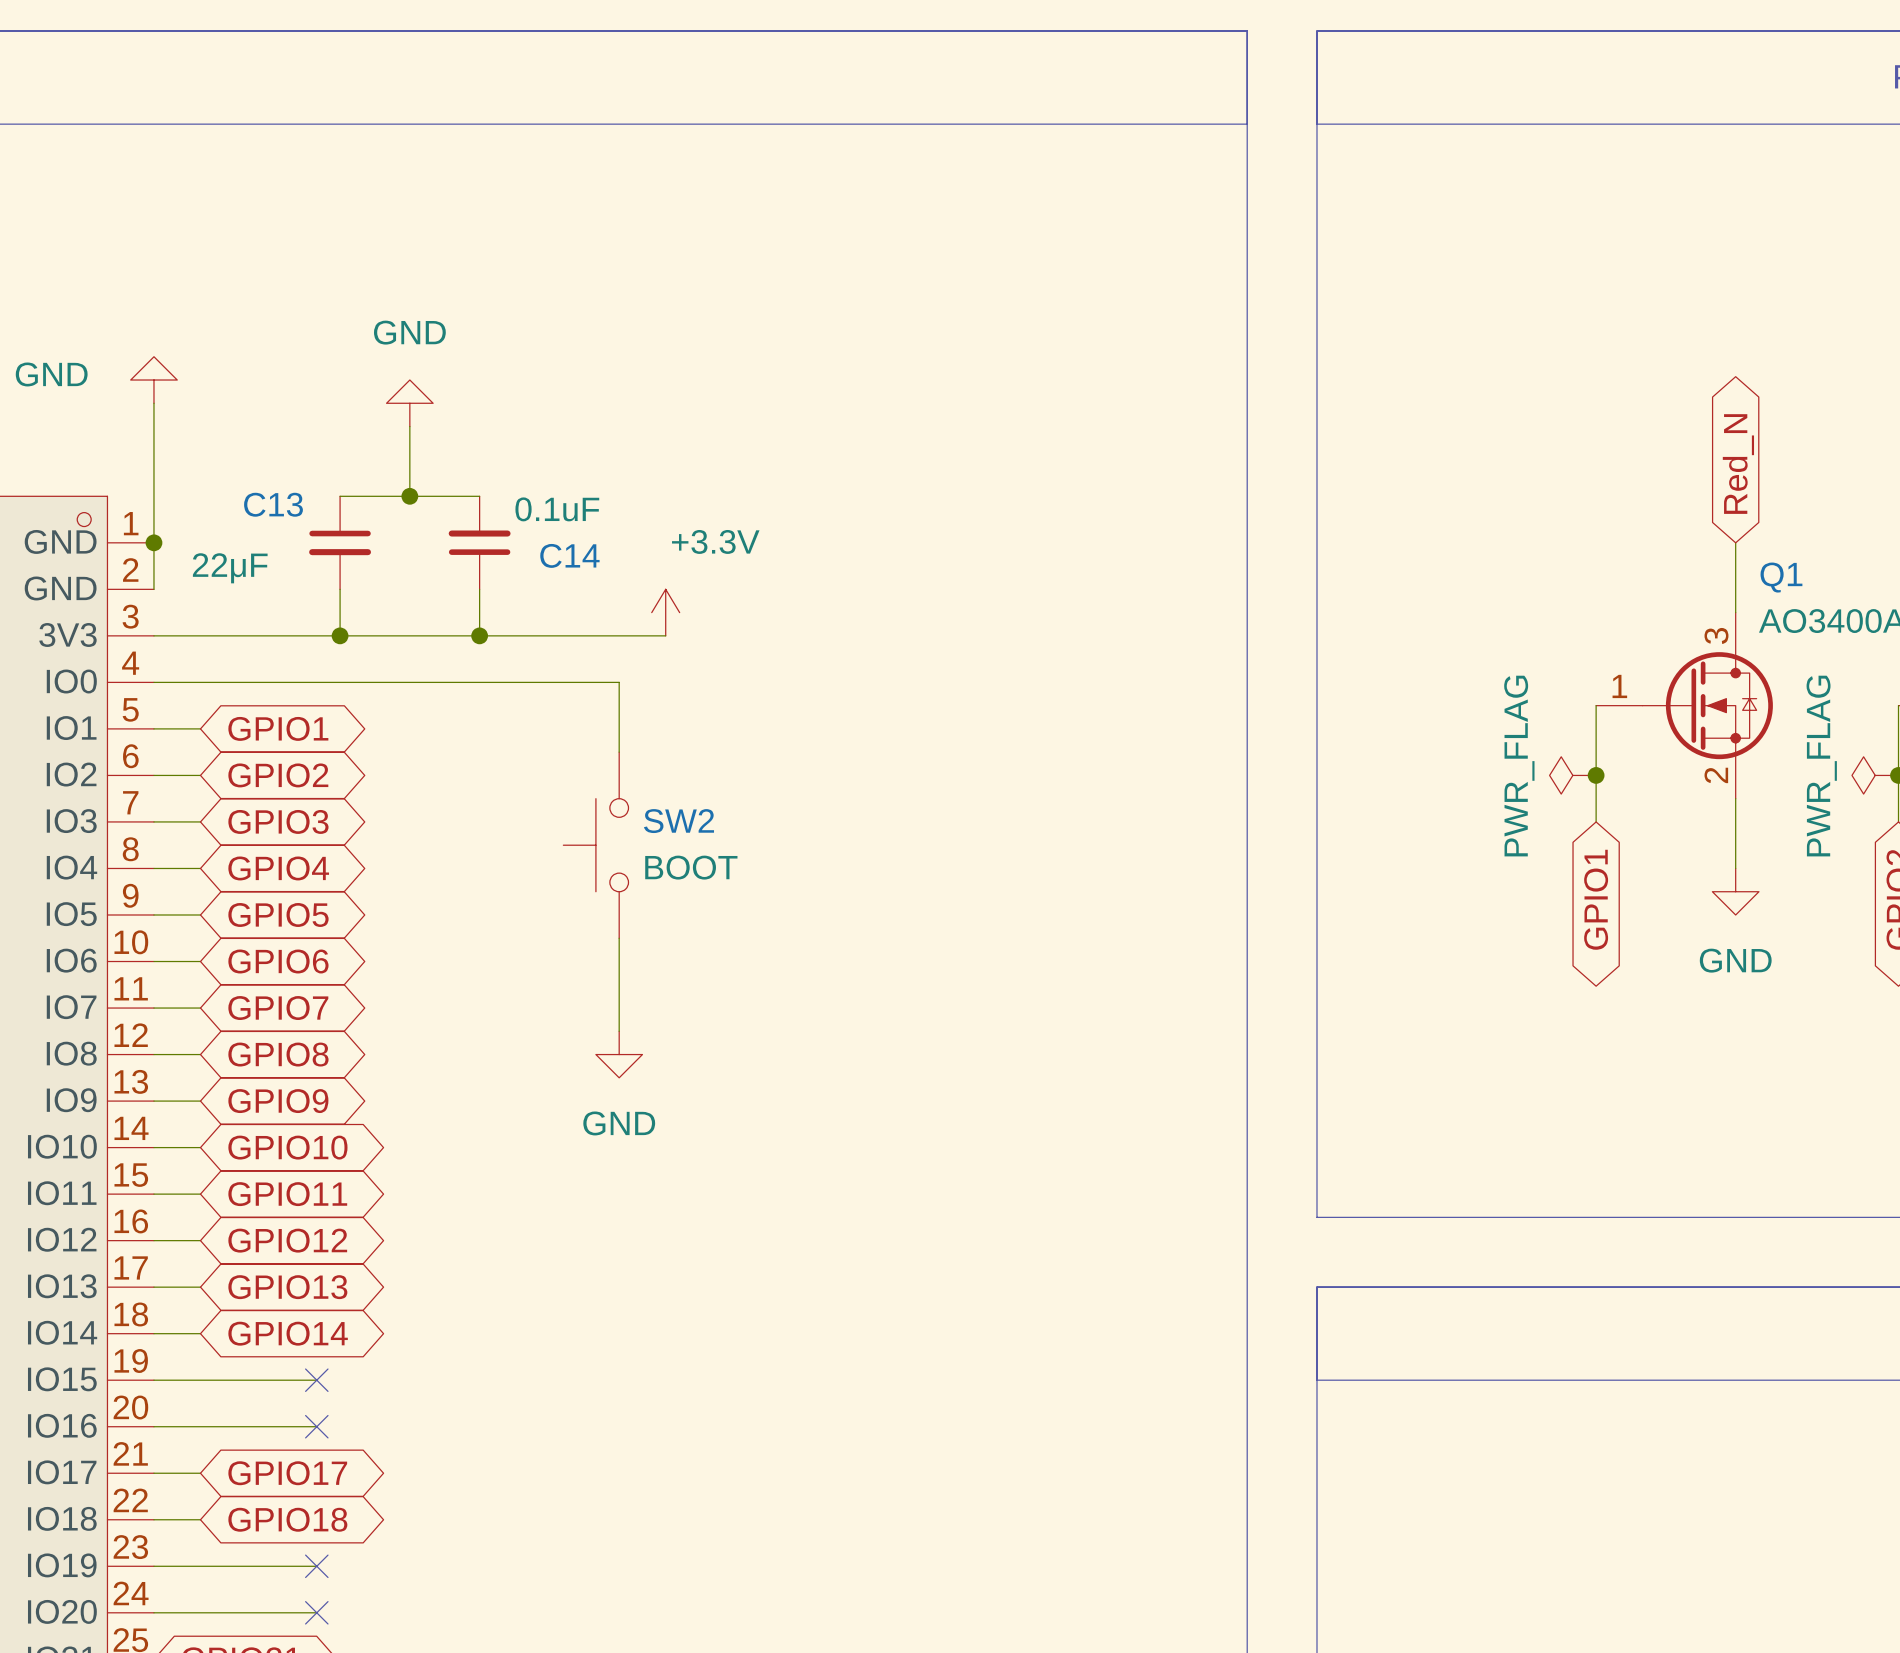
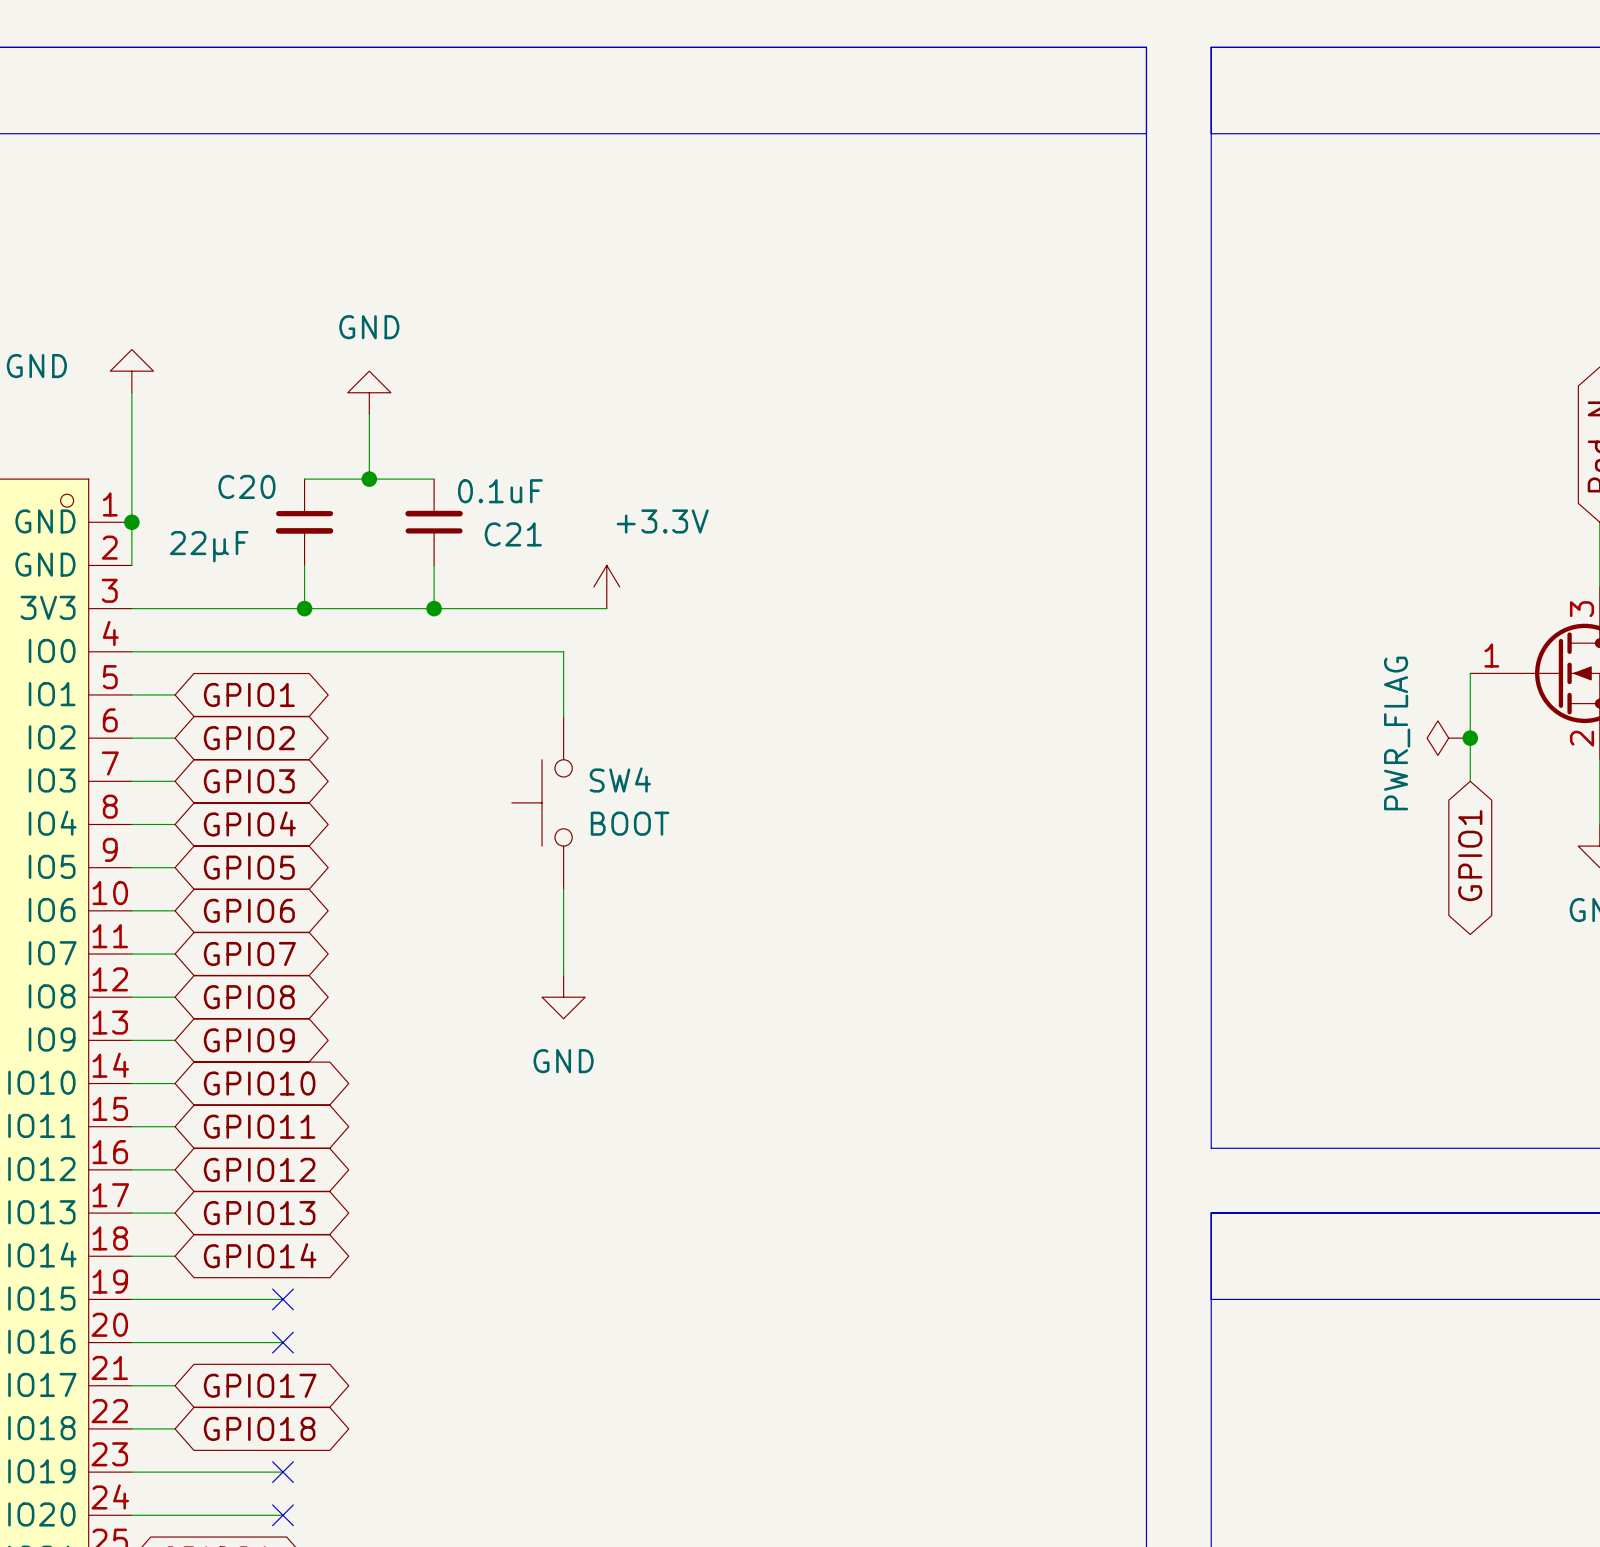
C13 name: C13 (273, 504) -> C20 (246, 486)
C14 name: C14 (569, 555) -> C21 (513, 534)
SW2 name: SW2 (679, 821) -> SW4 (620, 780)

